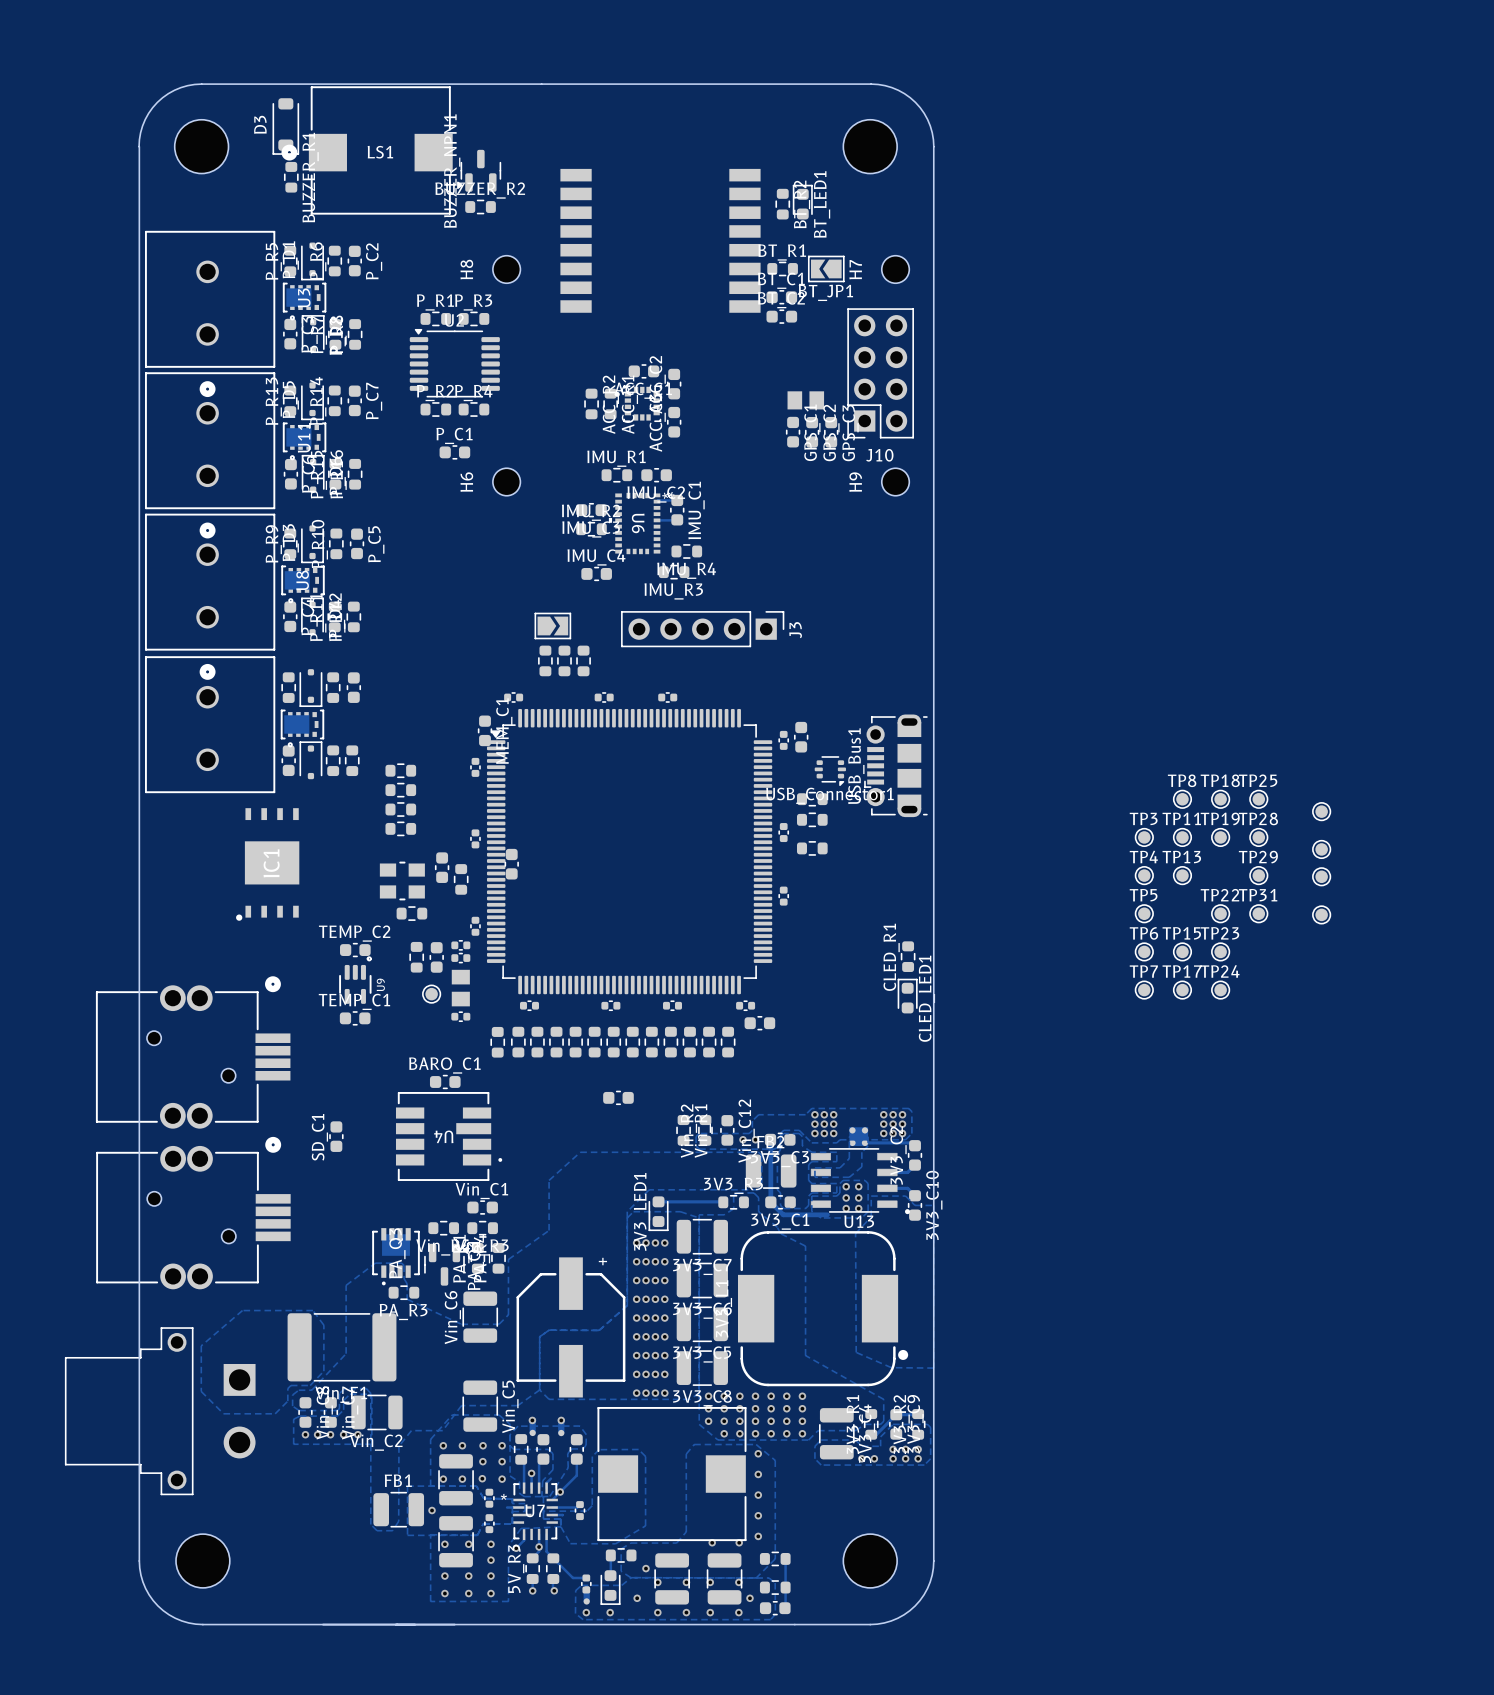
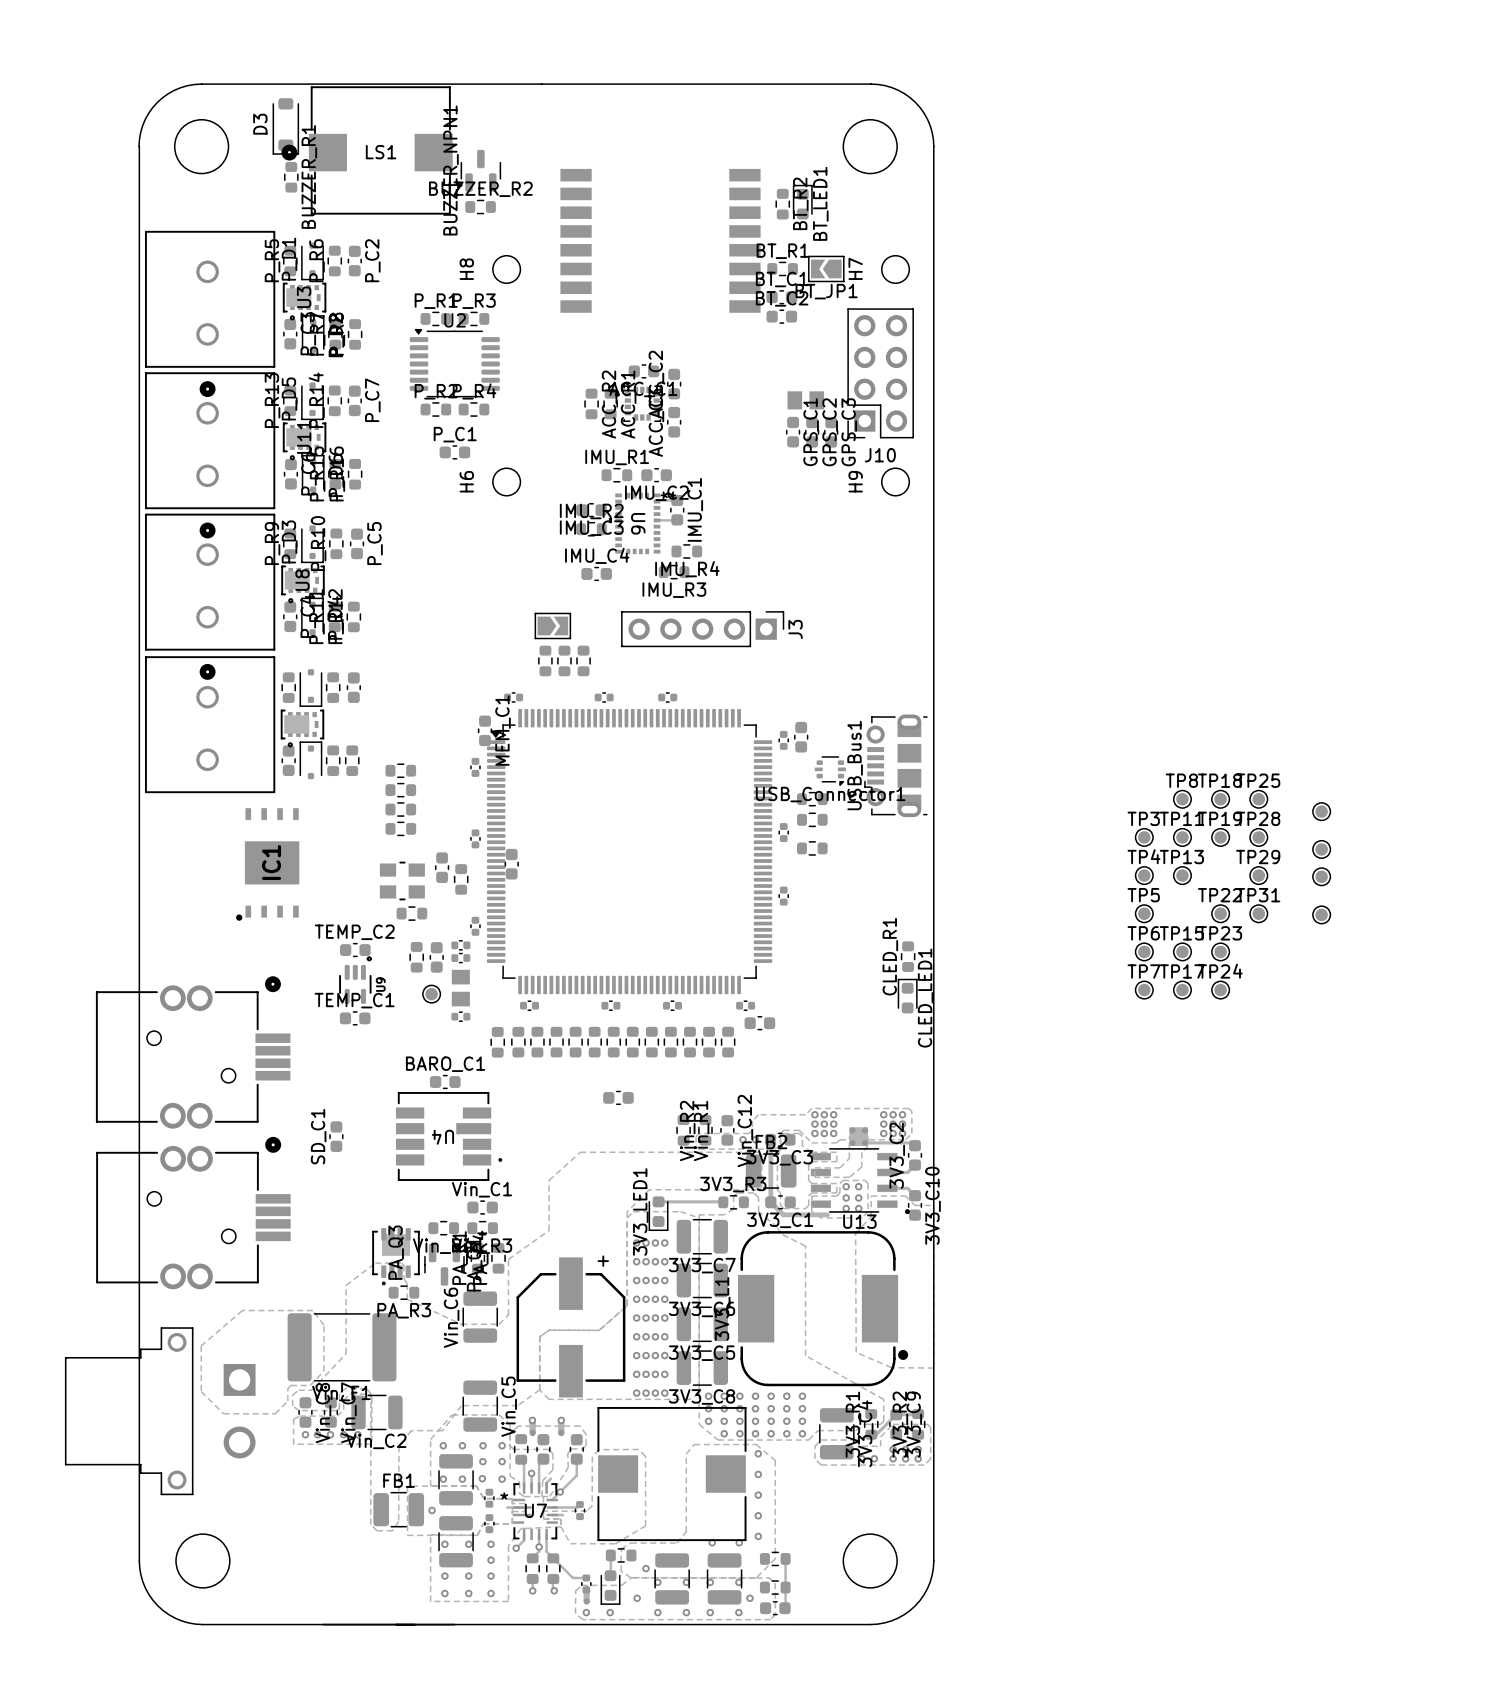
5V_R3 name: 5V_R3 (516, 1568) -> none

